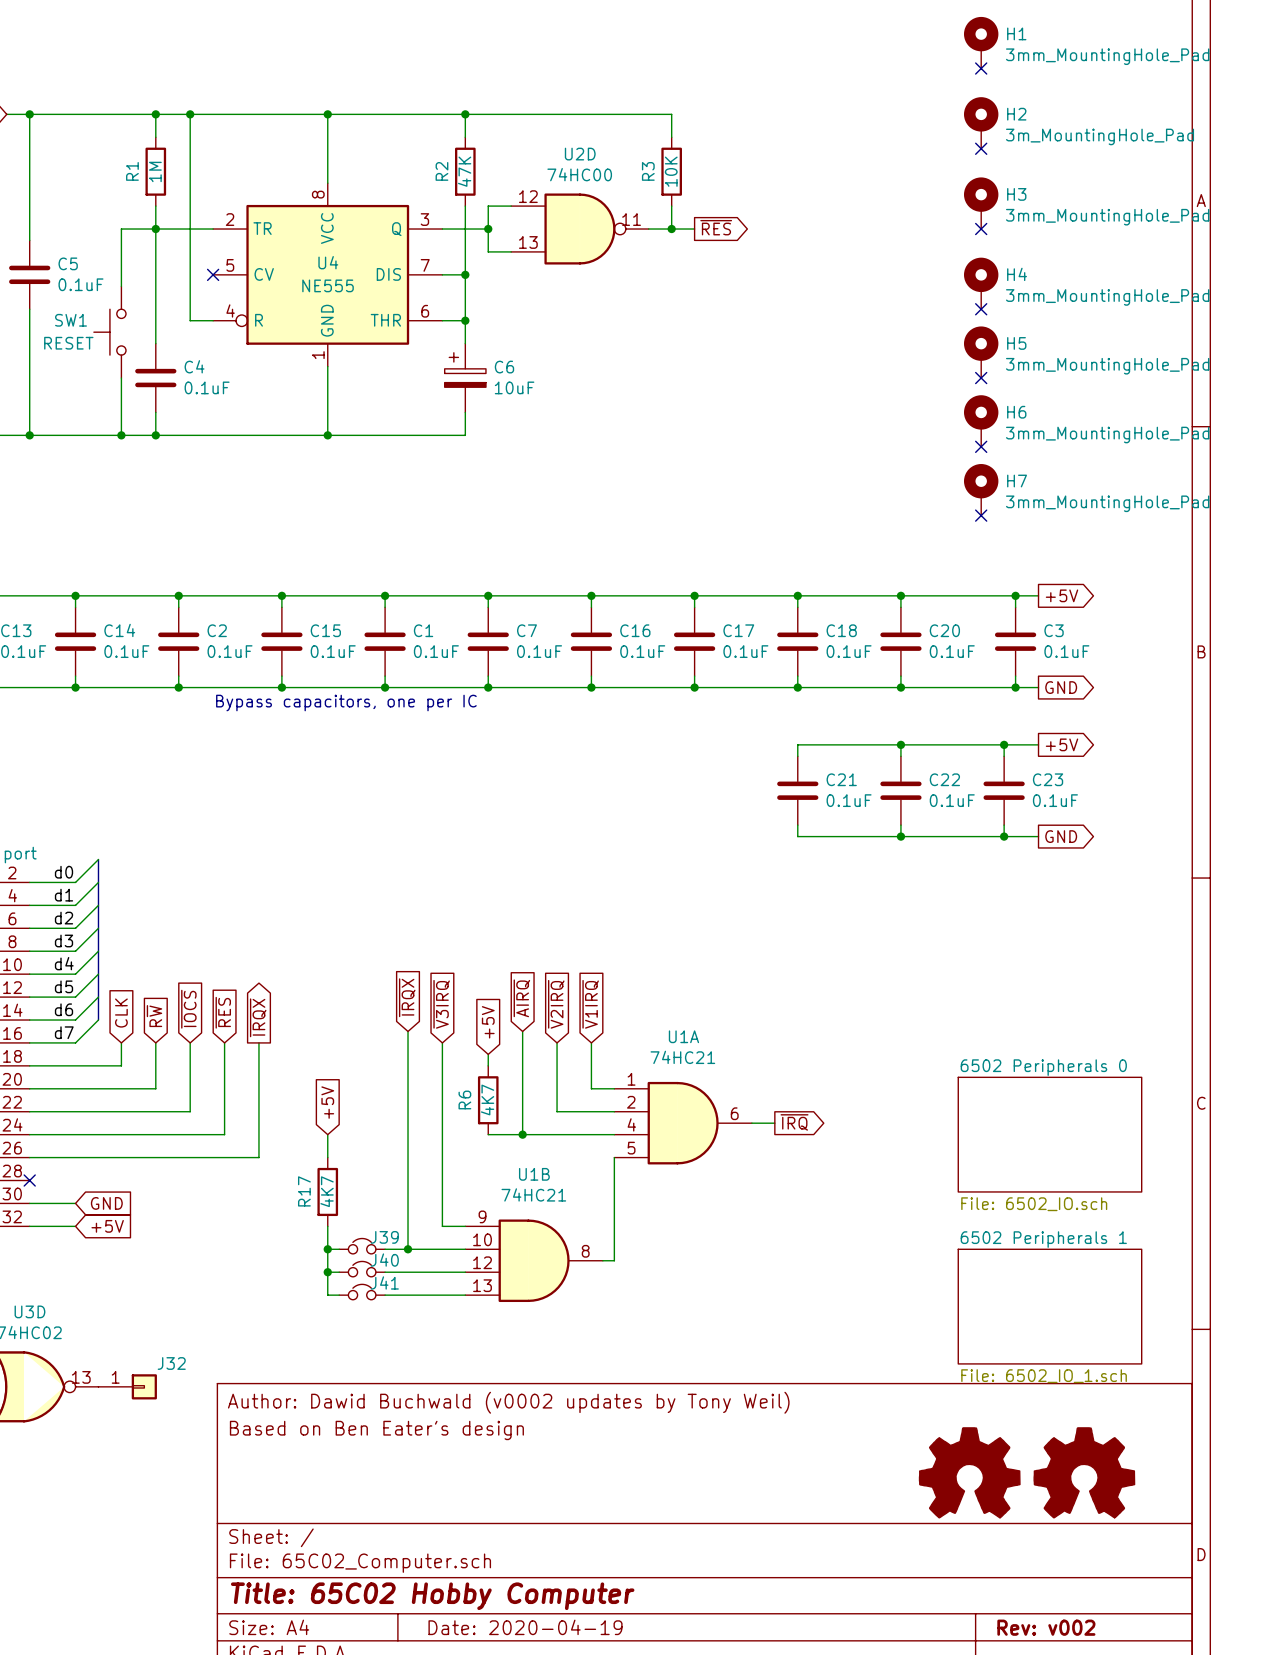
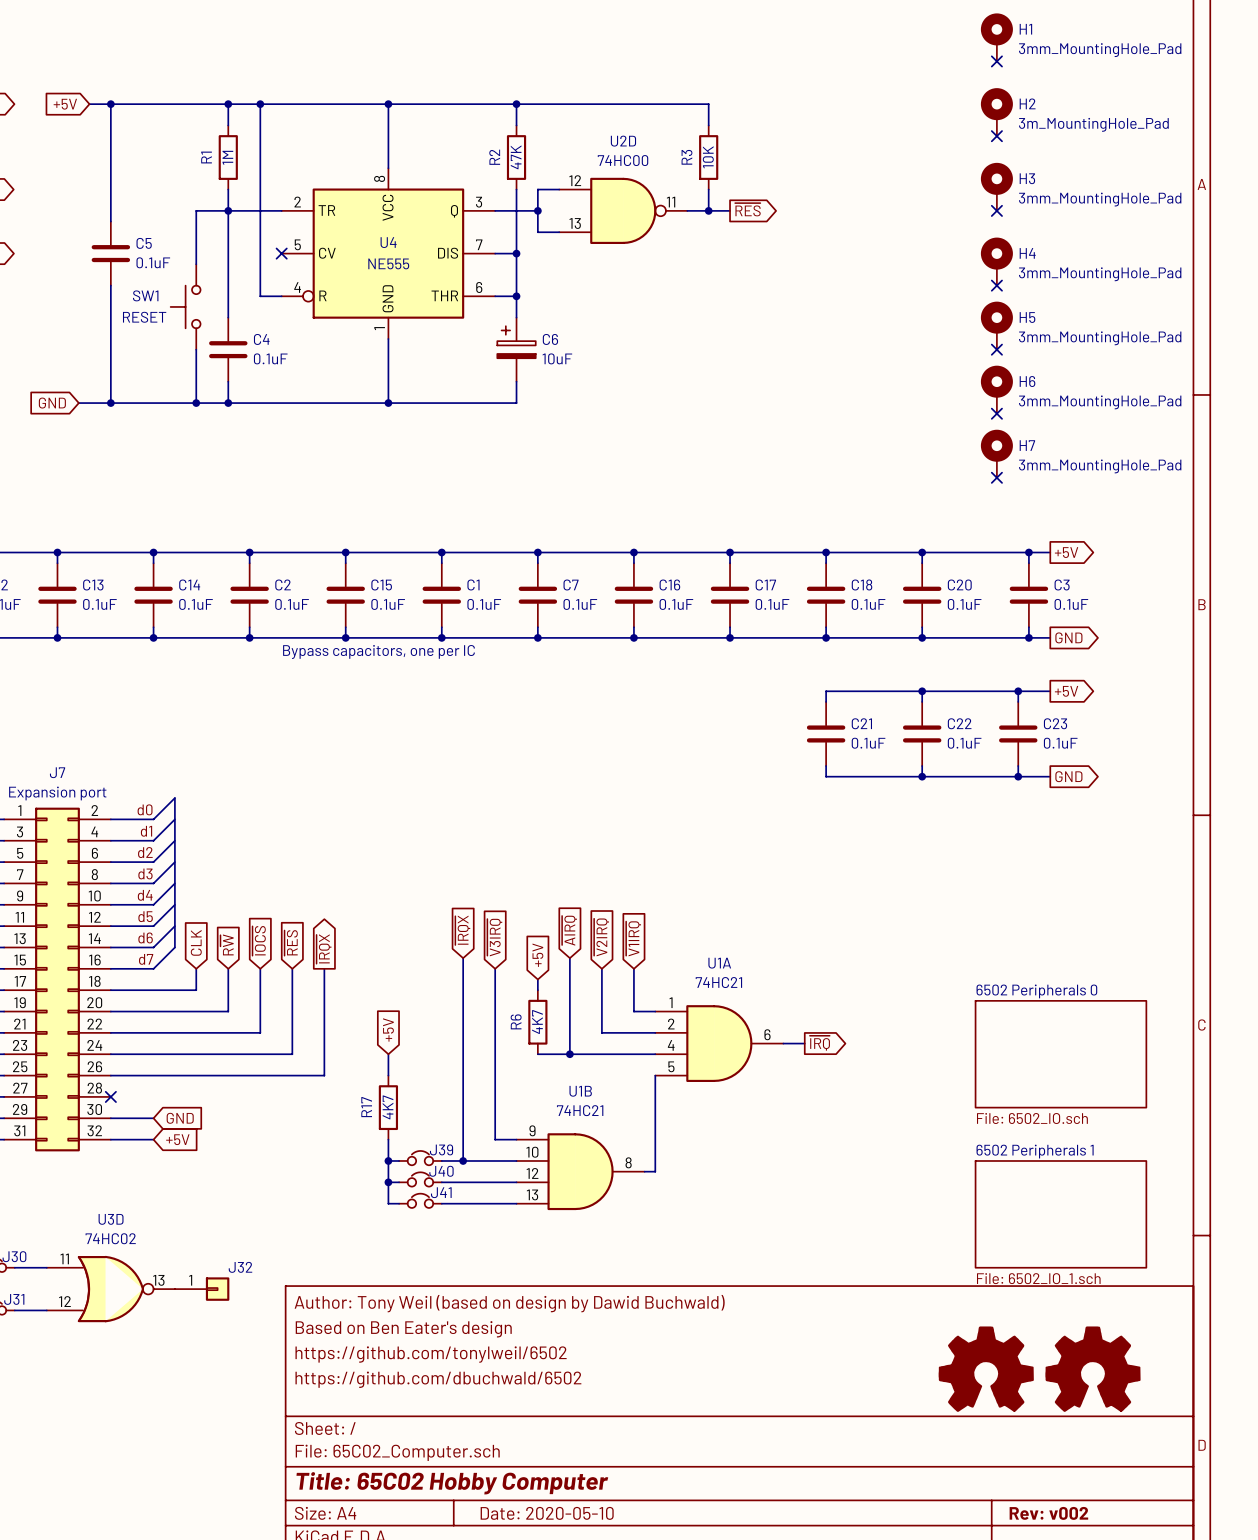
title block: Author: Dawid Buchwald (v0002 updates by Tony Weil) (508, 1402) -> Author: Tony Weil (based on design by Dawid Buchwald) (509, 1303)
title block: none -> https://github.com/tonylweil/6502 (431, 1354)
title block: none -> https://github.com/dbuchwald/6502 (438, 1379)
title block: Date: 2020-04-19 (525, 1627) -> Date: 2020-05-10 (547, 1513)

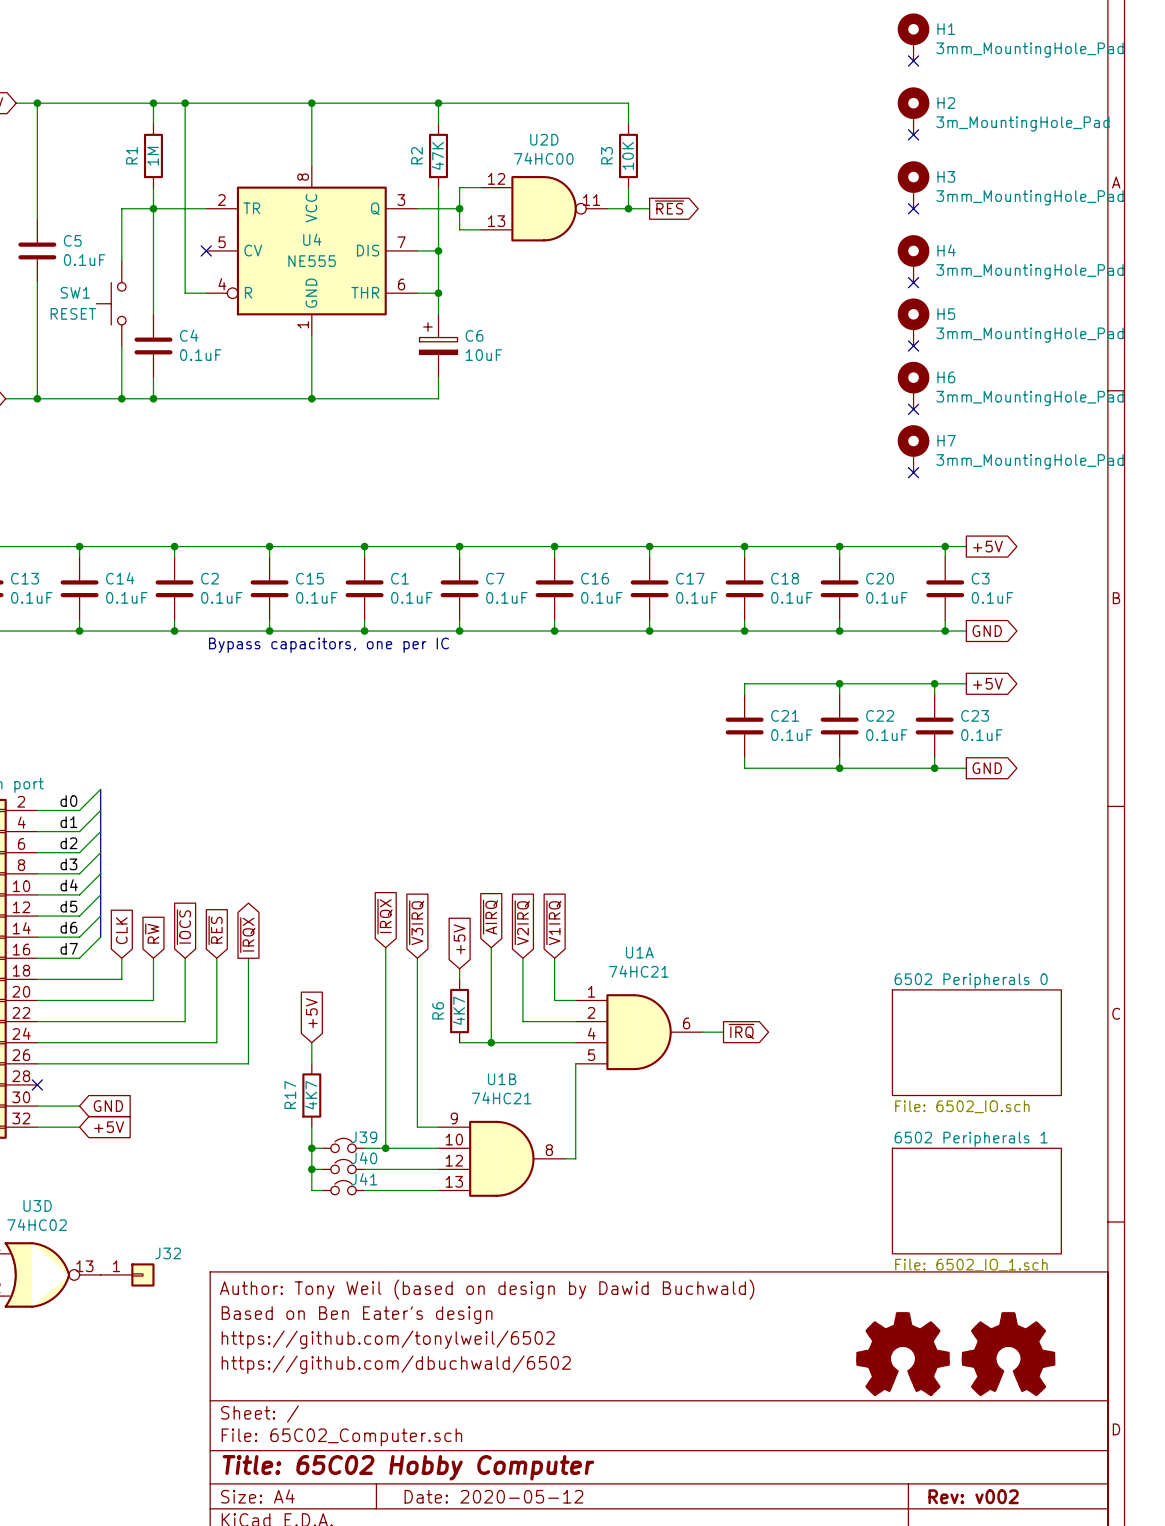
title block: Date: 2020-05-10 (547, 1513) -> Date: 2020-05-12 (493, 1496)

